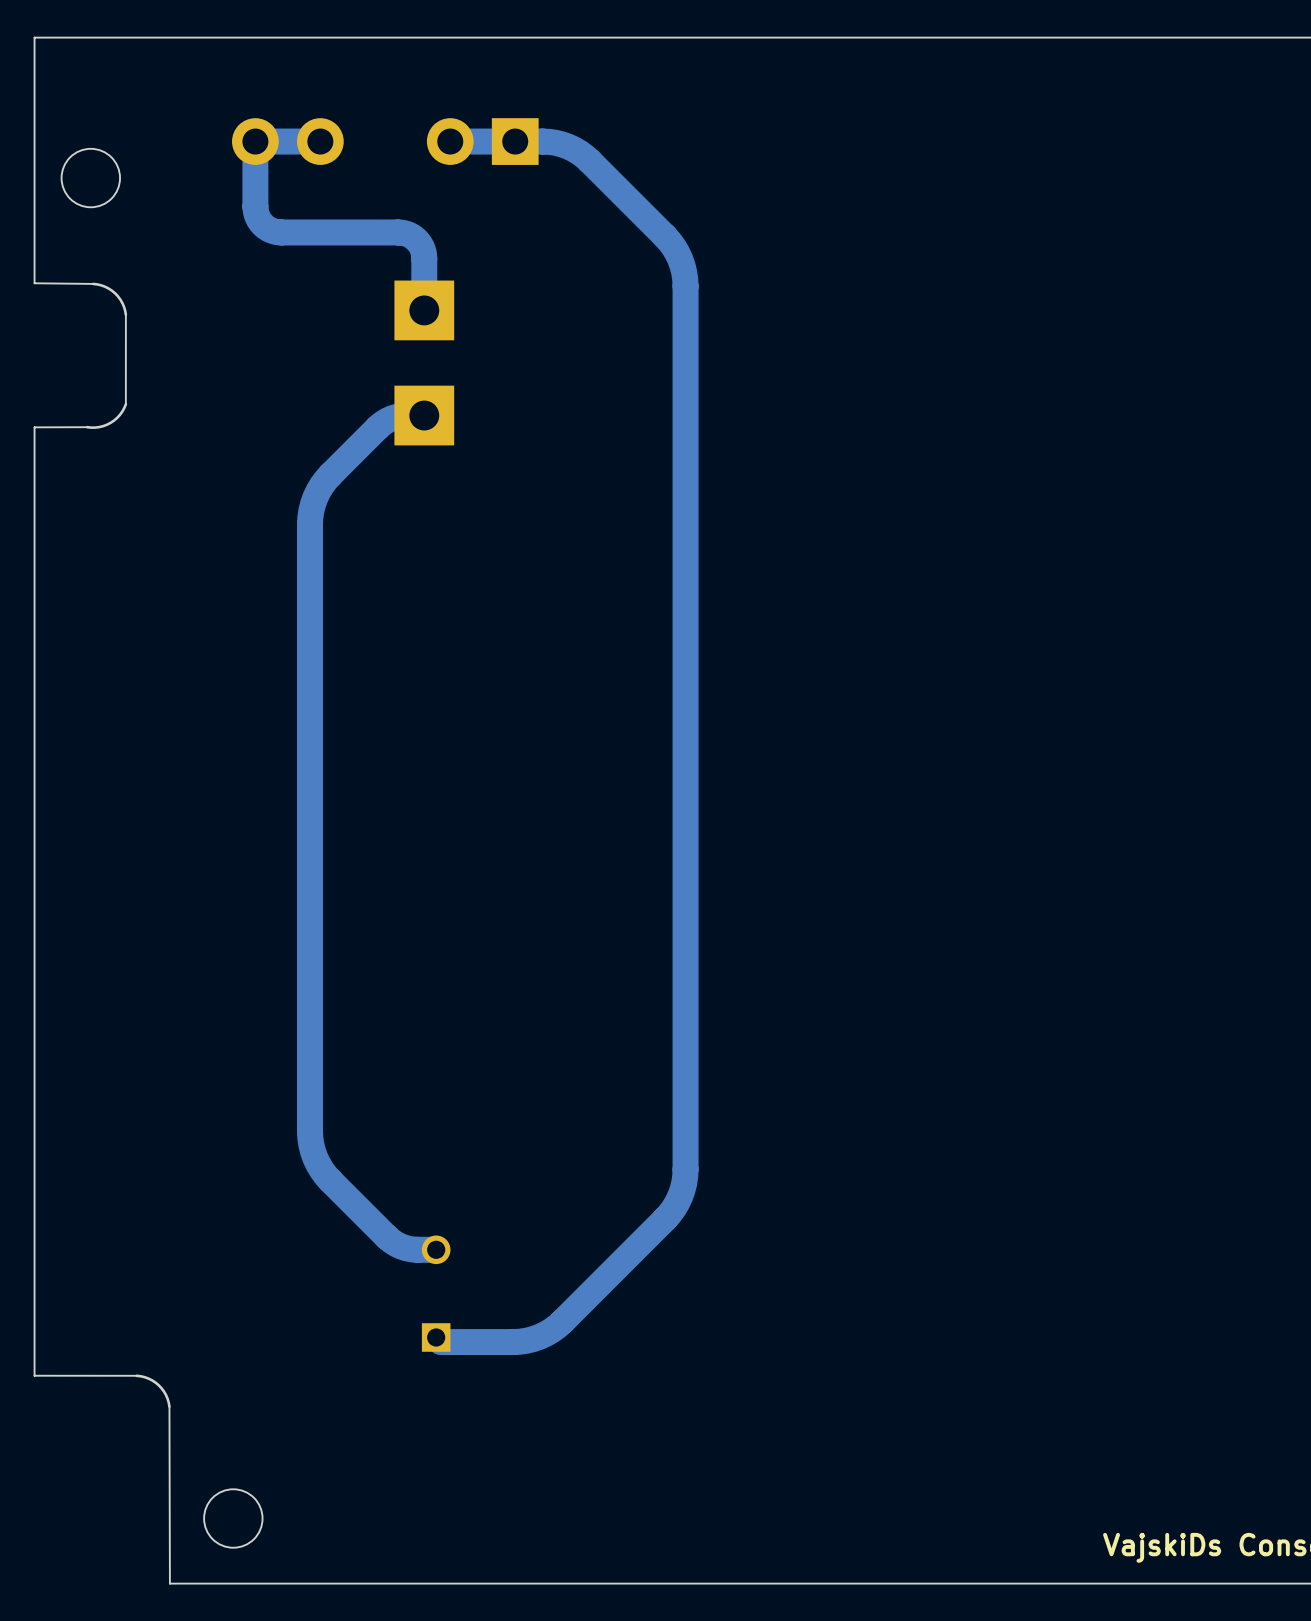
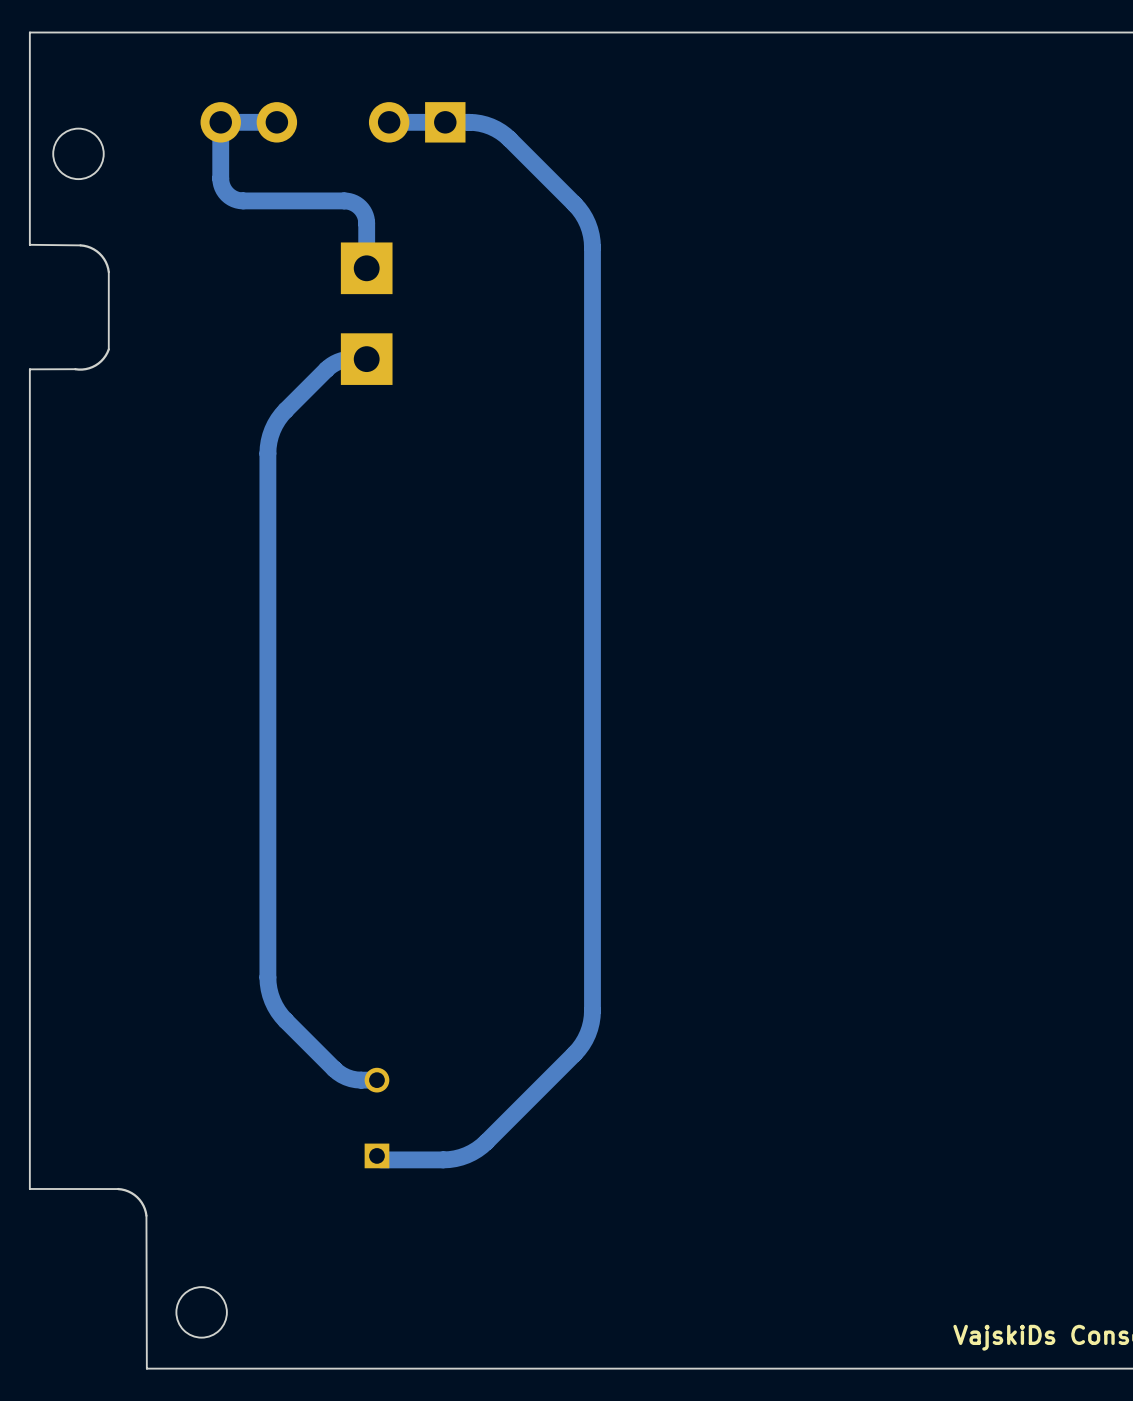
track width: thick (320, 141) (255, 141) (255, 206) (258, 219) (265, 227) (277, 232) (398, 232) (409, 235) (418, 242) (423, 252) (424, 310) -> thin (276, 122) (220, 122) (220, 178) (223, 189) (229, 196) (240, 200) (344, 200) (353, 203) (361, 209) (366, 218) (366, 268)
track width: thick (450, 141) (549, 141) (573, 149) (589, 160) (669, 241) (677, 252) (684, 272) (685, 1169) (682, 1189) (669, 1214) (552, 1330) (533, 1339) (519, 1341) (440, 1342) -> thin (389, 122) (474, 122) (496, 129) (509, 139) (578, 208) (585, 218) (591, 235) (592, 1010) (589, 1028) (578, 1049) (477, 1149) (460, 1157) (449, 1159) (380, 1159)
track width: thick (424, 415) (398, 416) (380, 424) (326, 479) (315, 497) (311, 510) (309, 1130) (313, 1151) (321, 1170) (386, 1236) (395, 1243) (406, 1248) (436, 1249) -> thin (366, 359) (344, 359) (329, 367) (281, 414) (272, 430) (269, 441) (267, 977) (270, 995) (278, 1011) (334, 1068) (351, 1078) (376, 1080)

